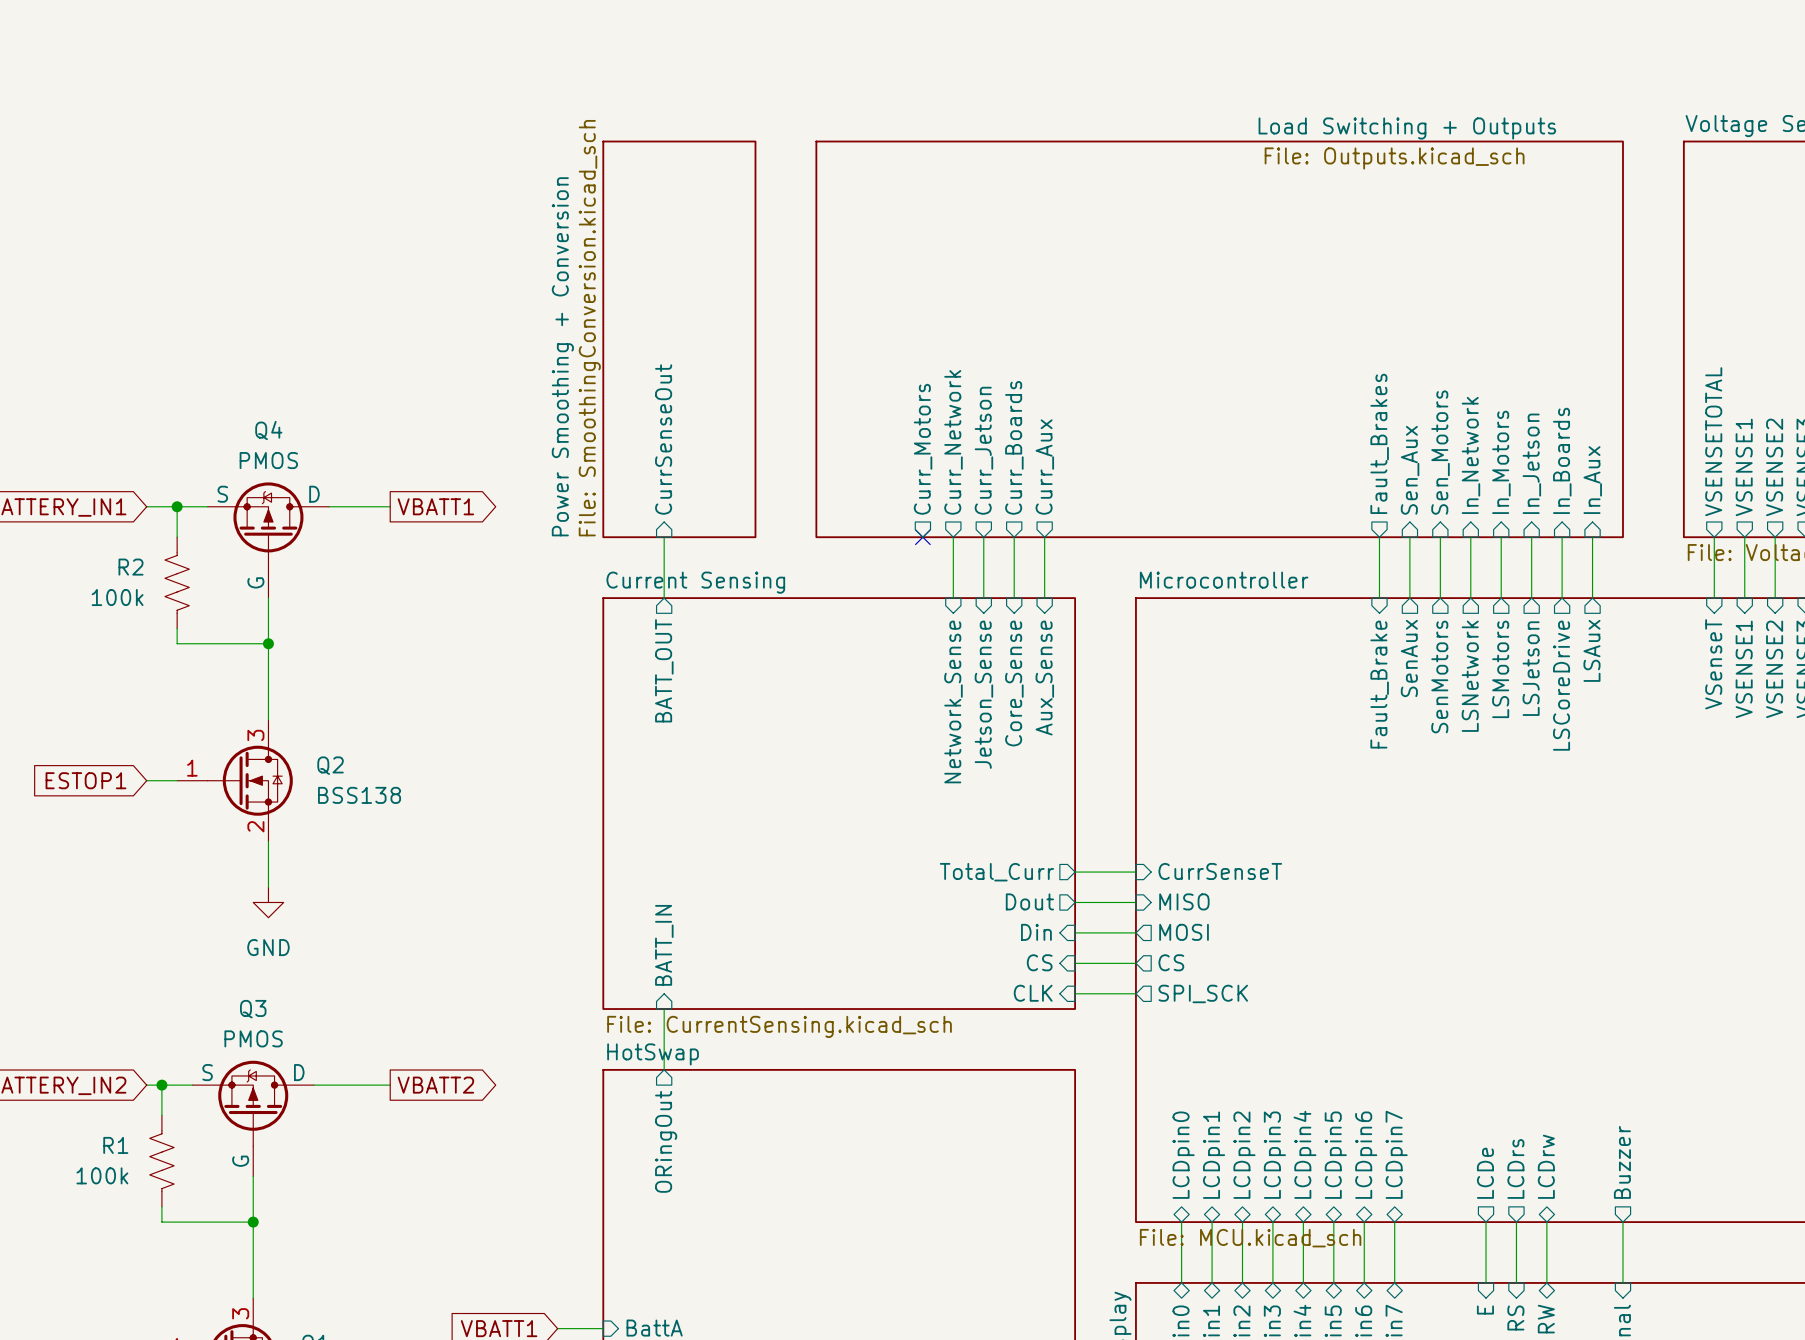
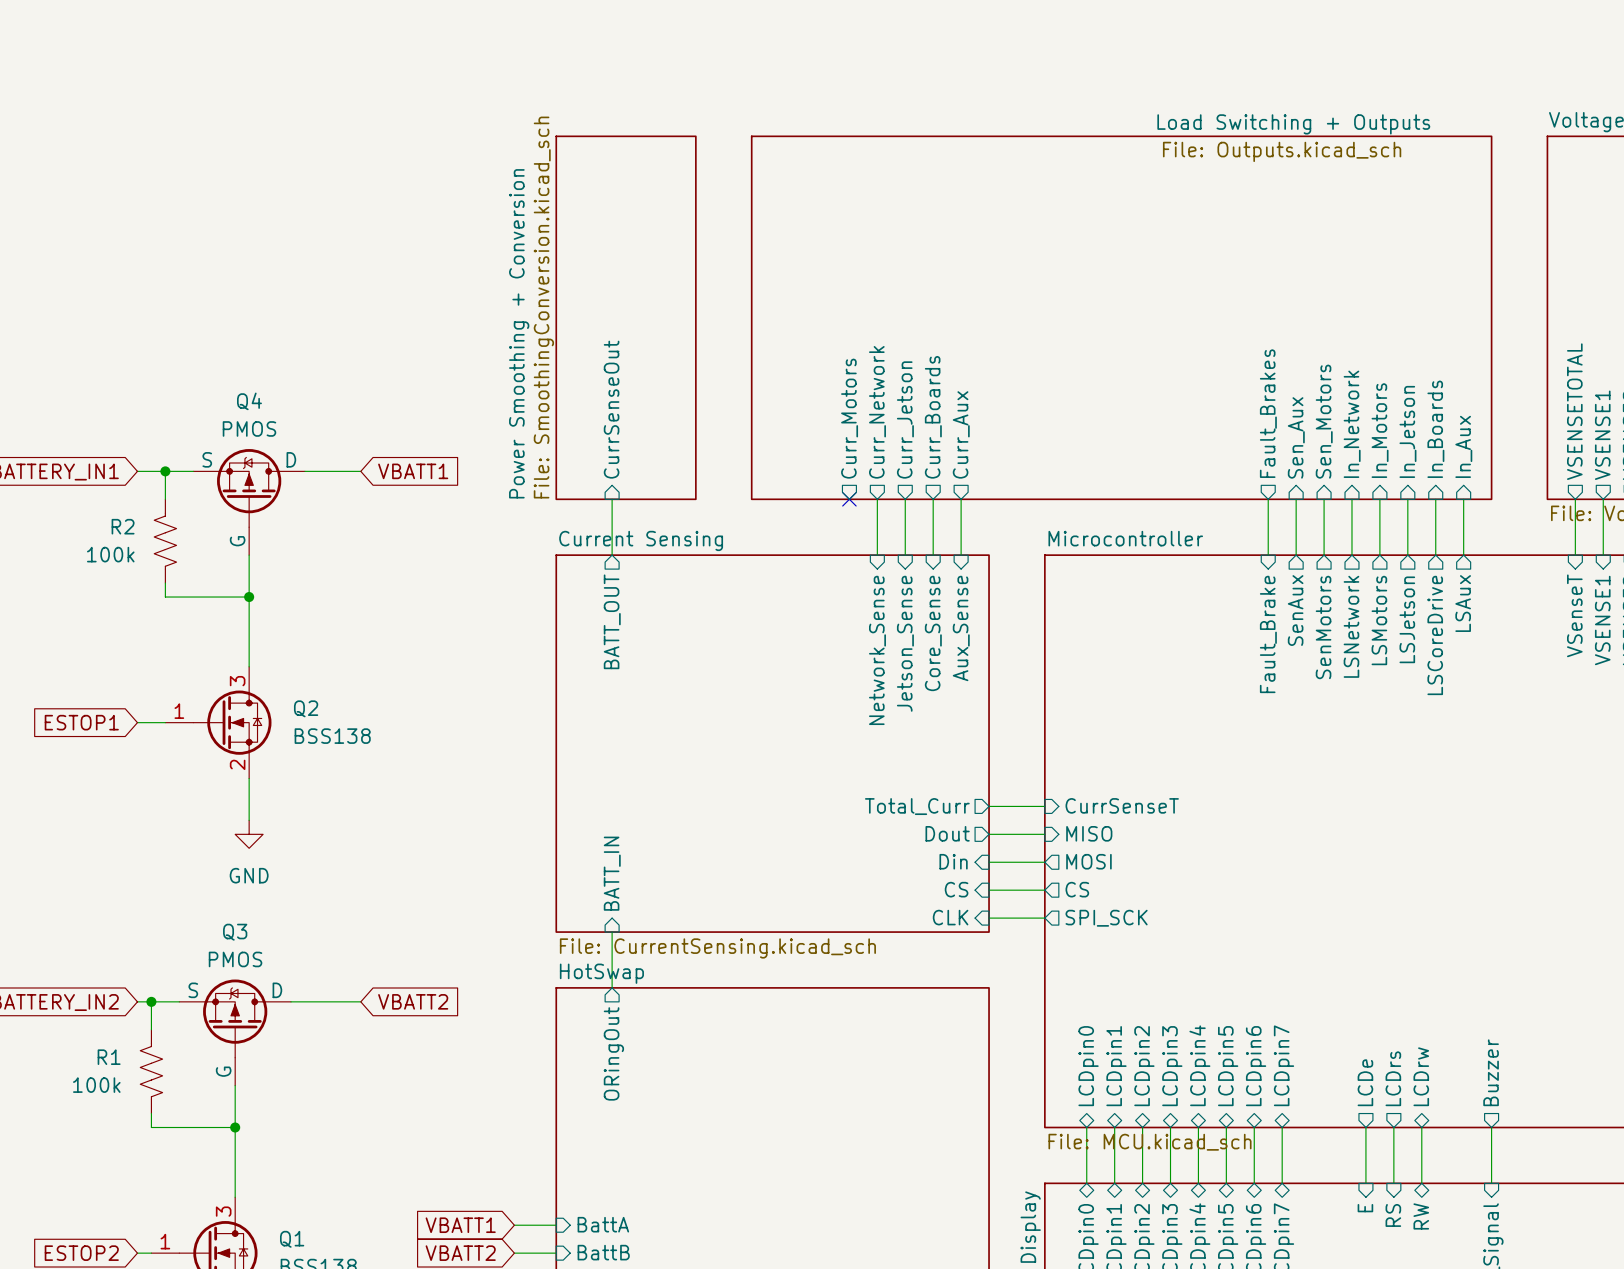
global label shape: output (435, 506) -> input (413, 471)
global label shape: output (435, 1085) -> input (413, 1001)

